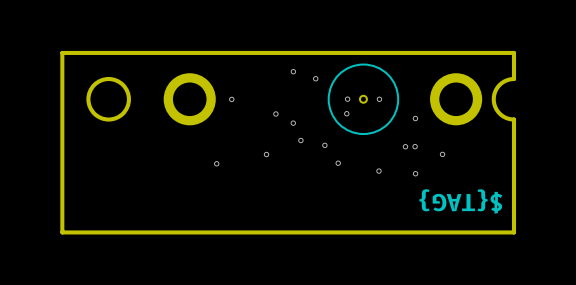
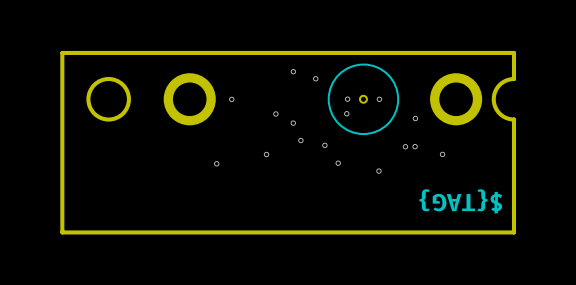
via: (415, 173) -> none

